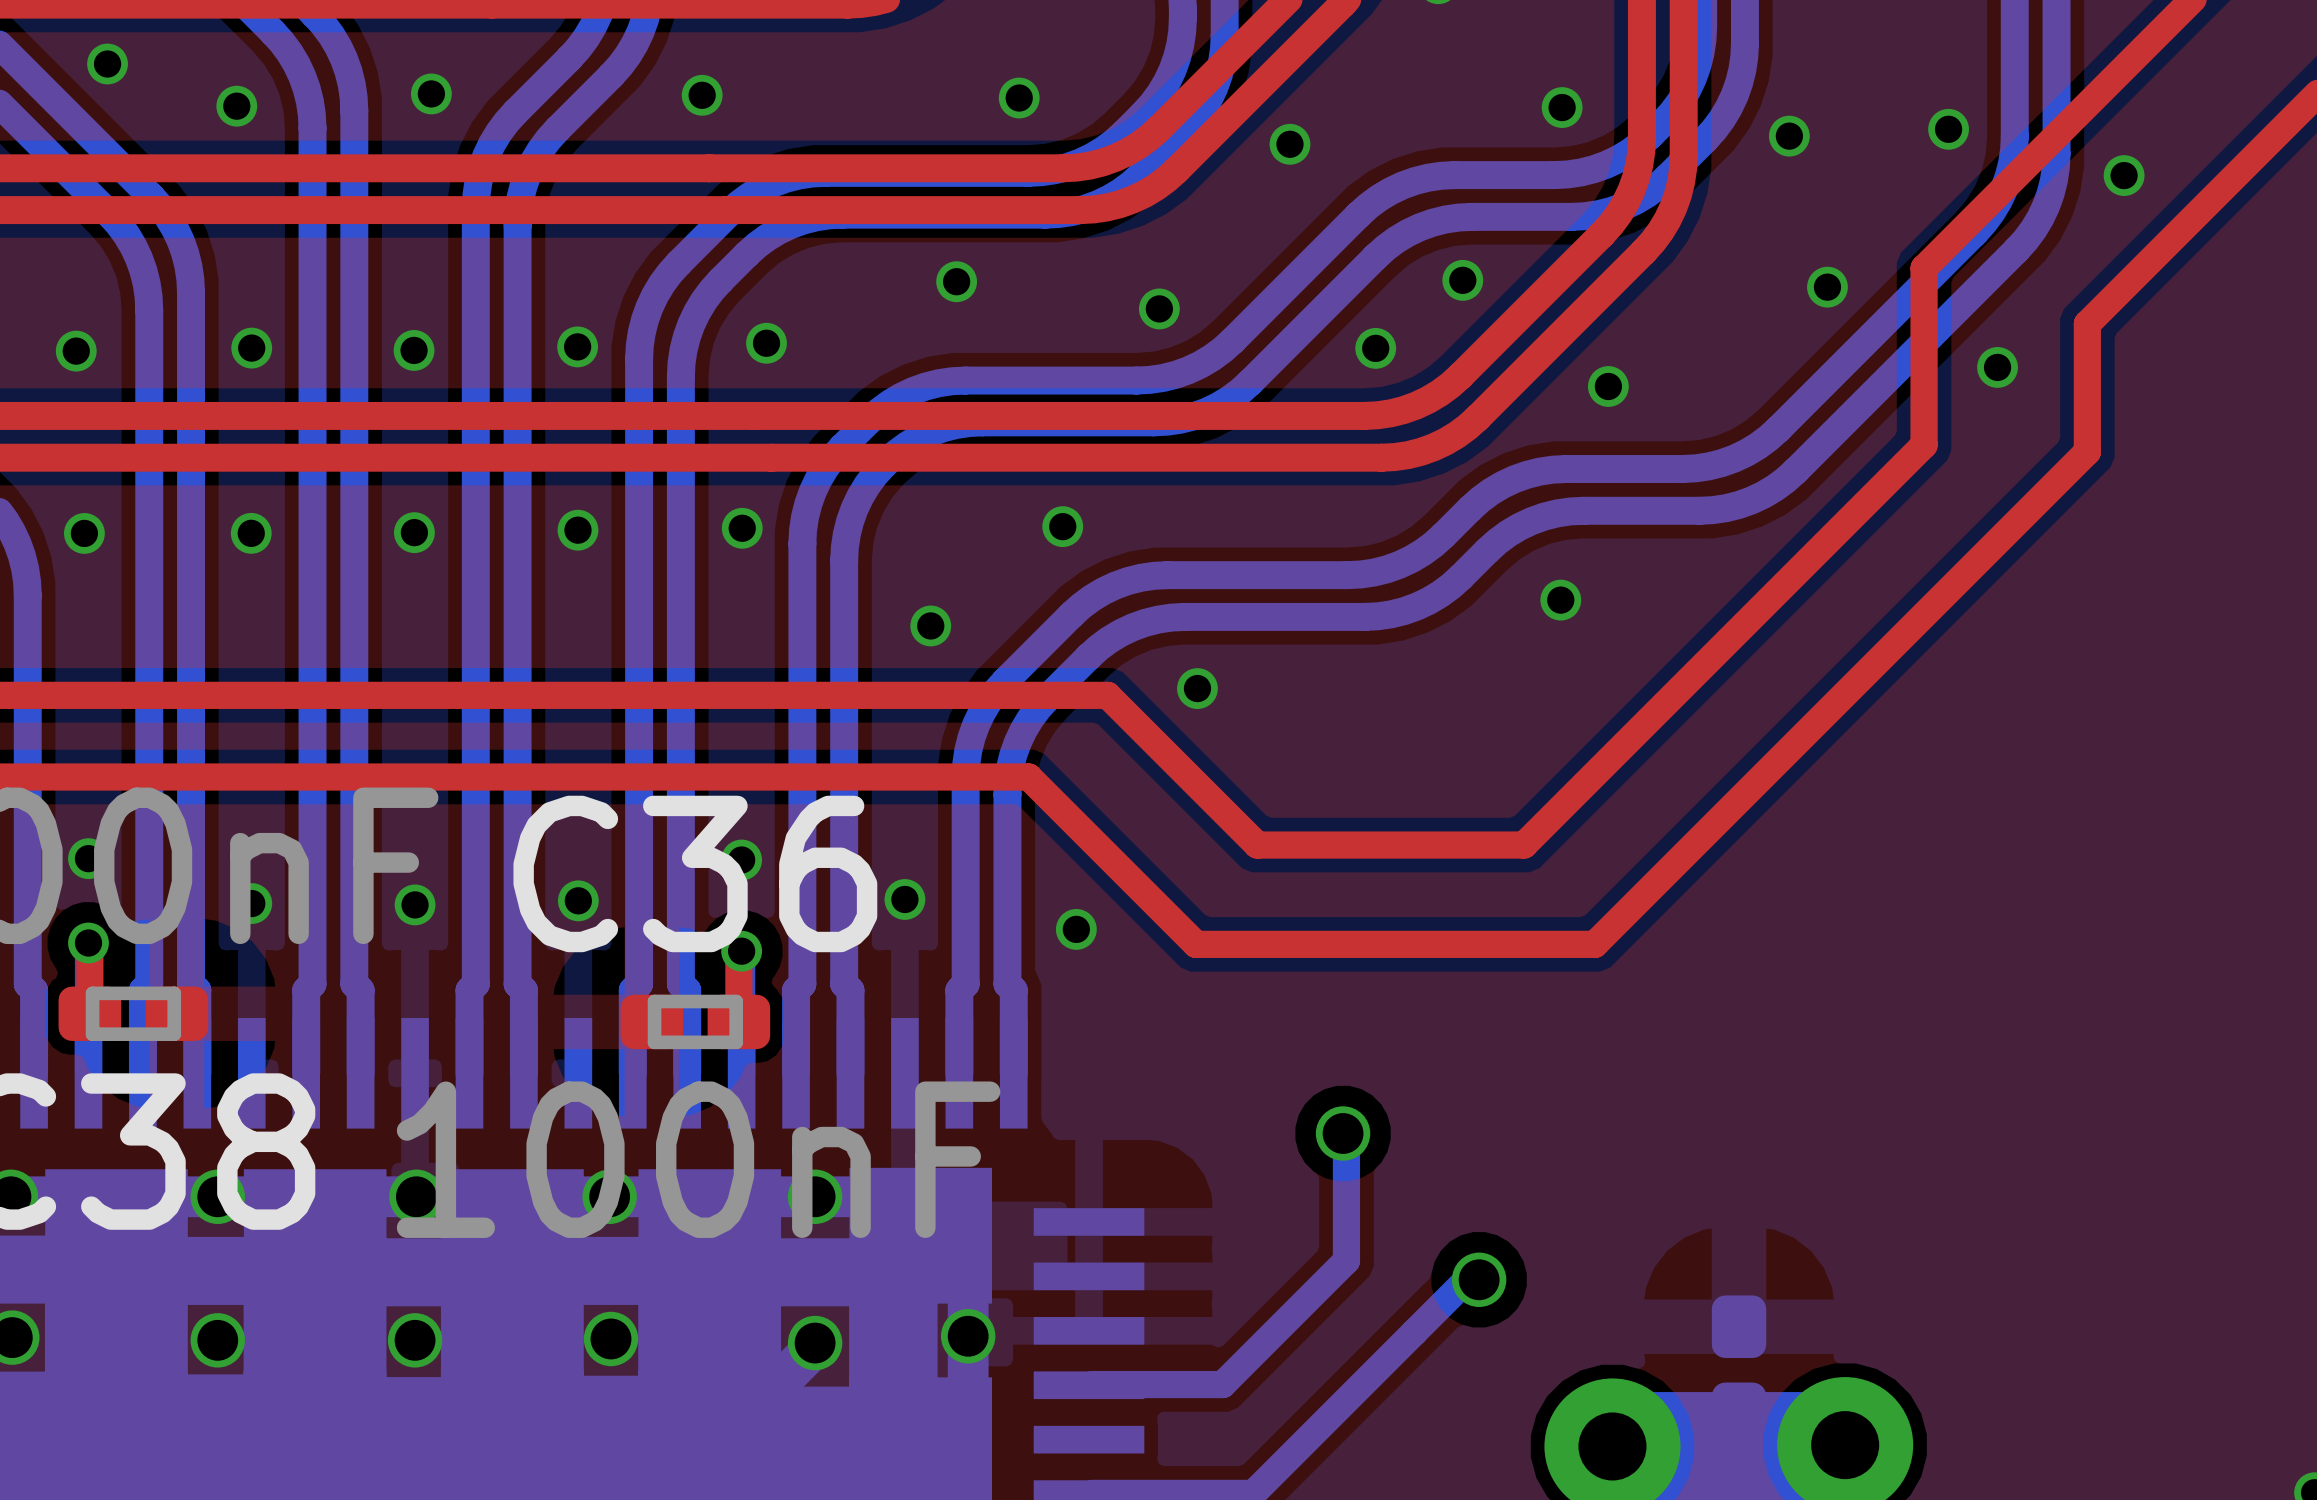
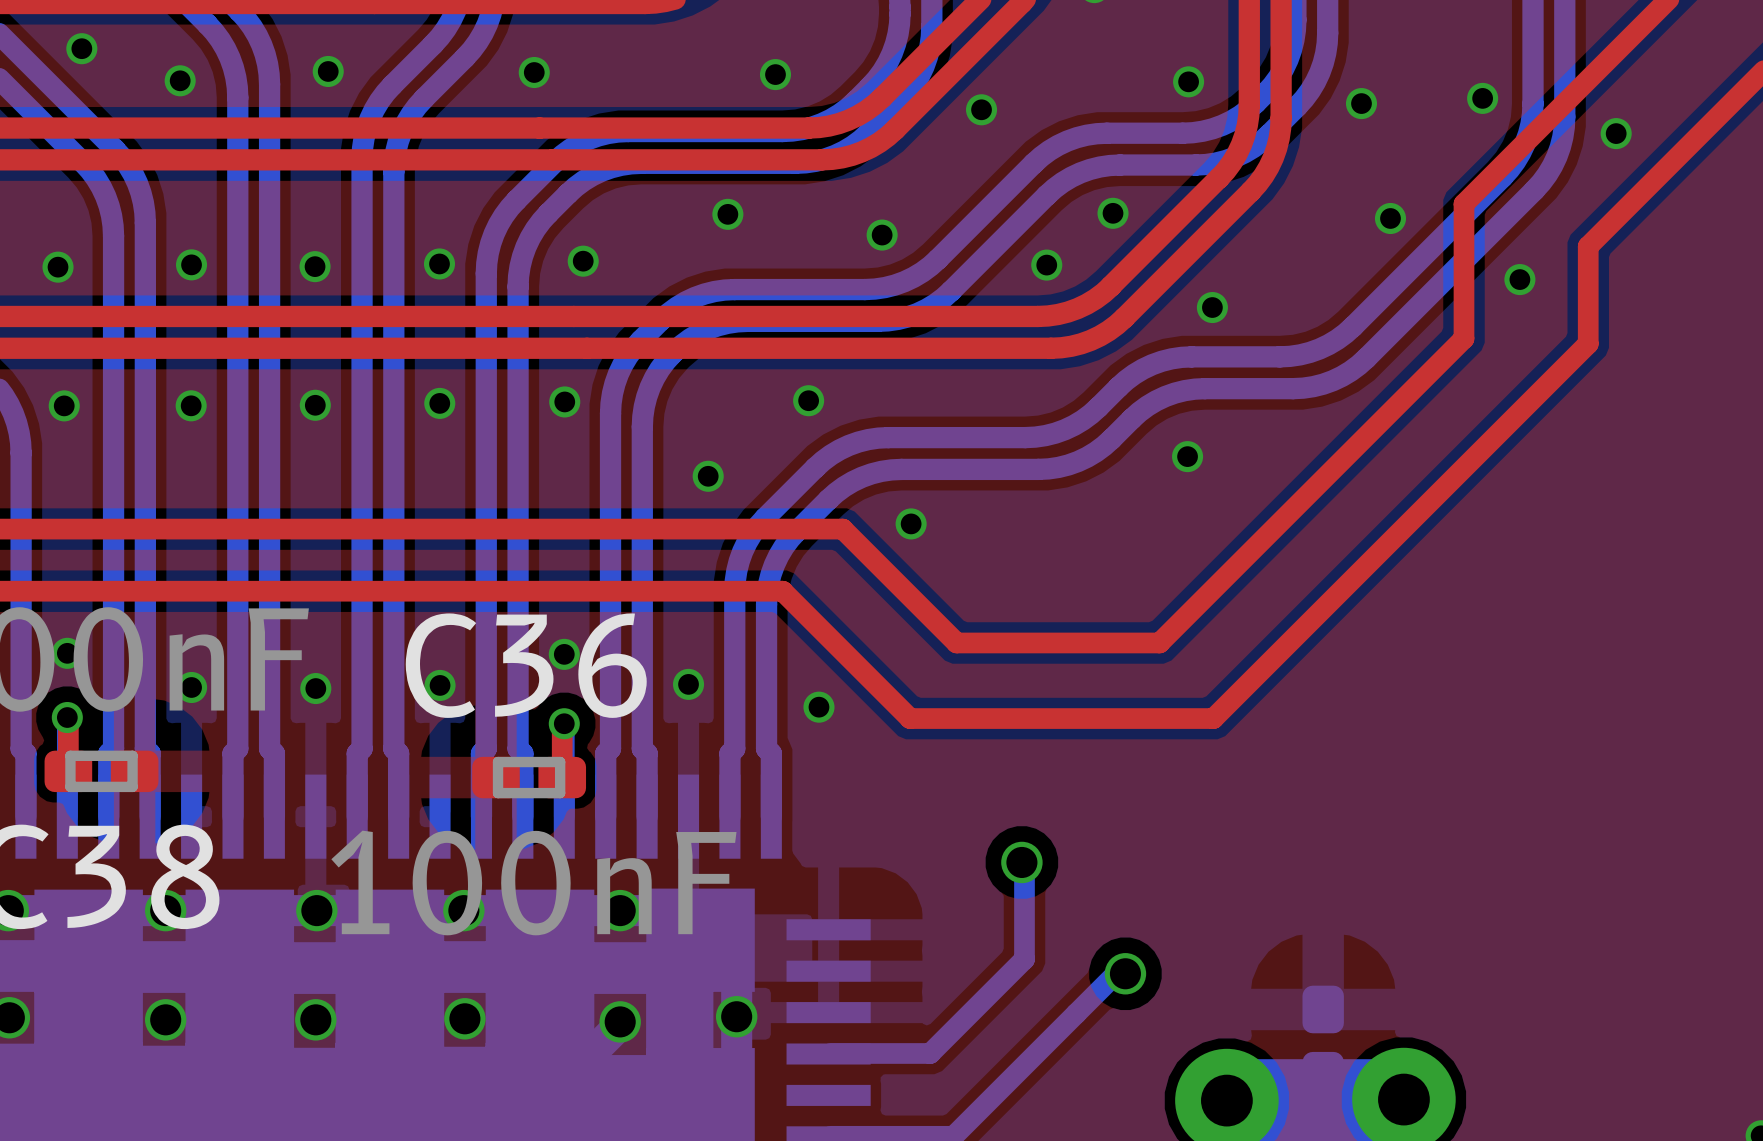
via position: (1608, 386) -> (1212, 307)

